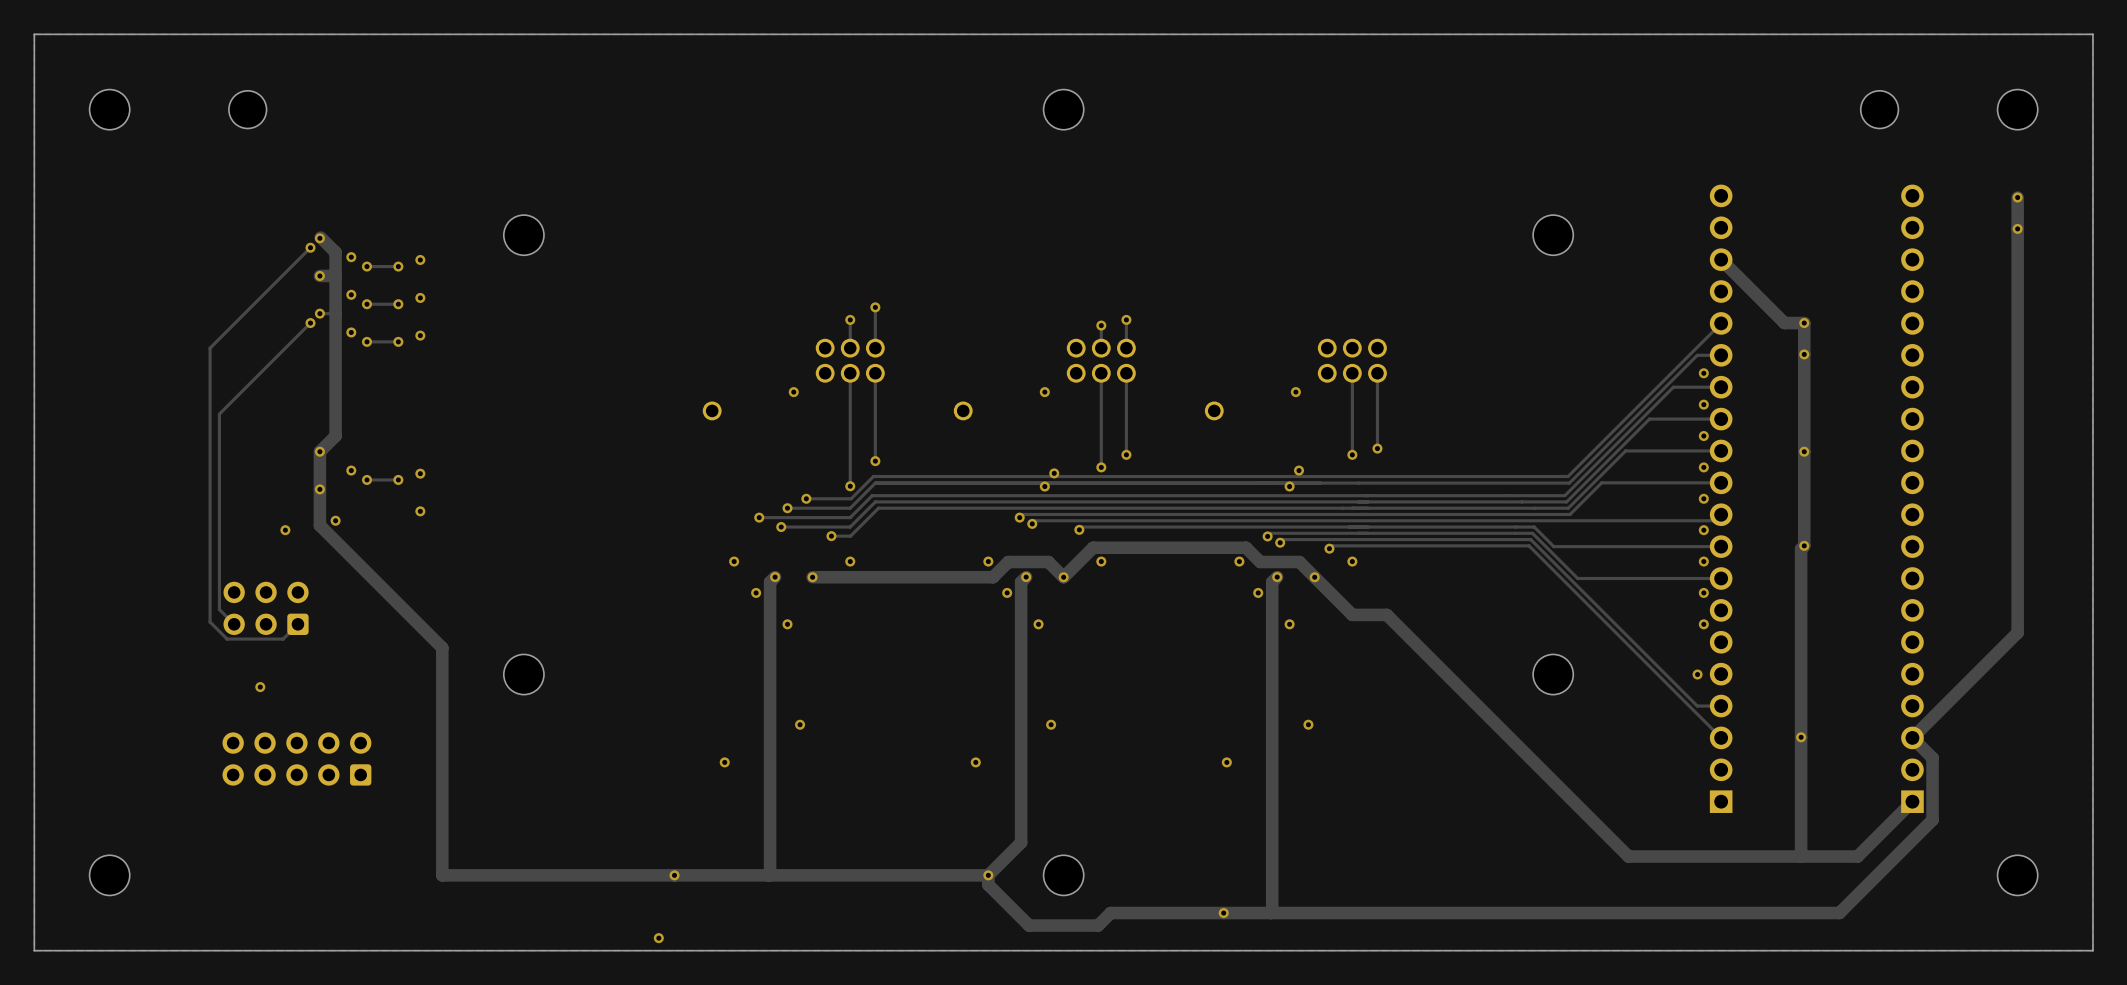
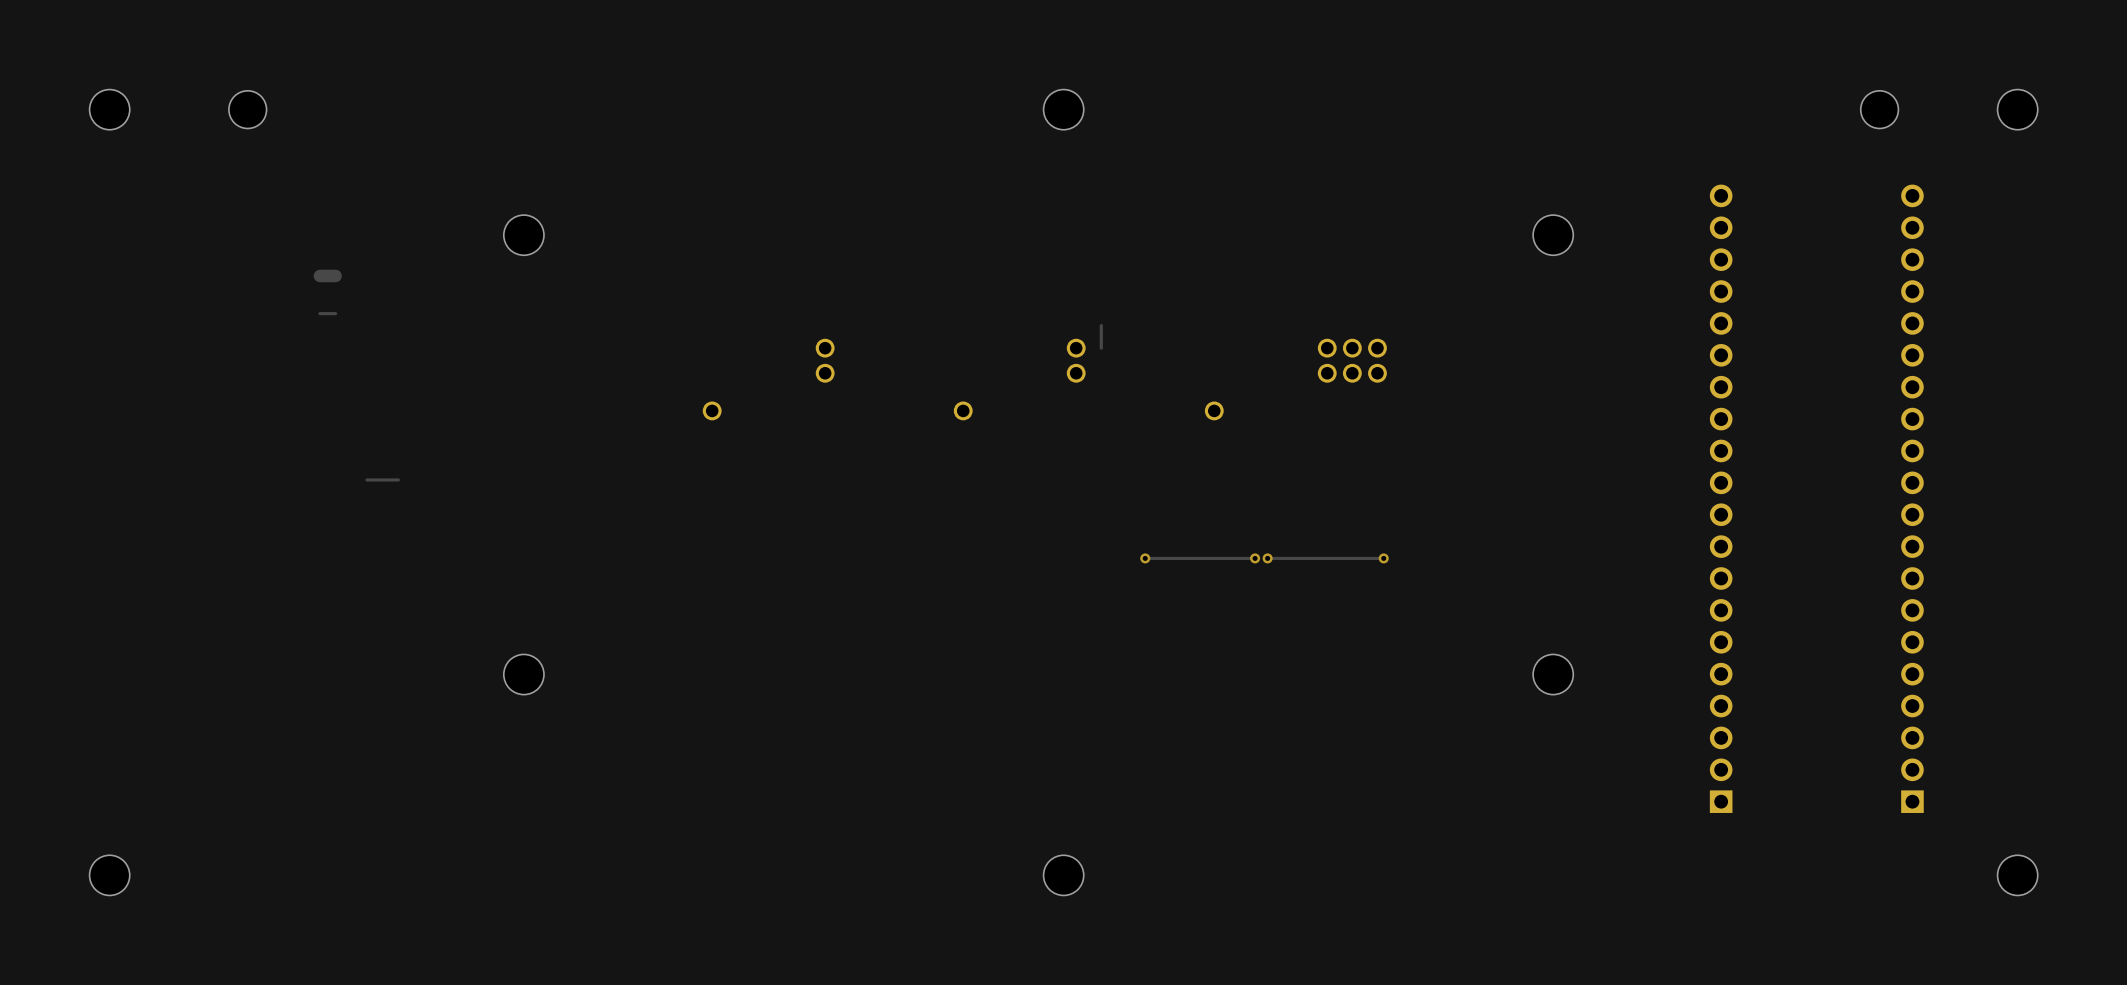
board edge: (2092, 34) (2092, 950) (34, 950) (34, 34) (2092, 34) -> none
track: (2017, 197) (2017, 632) (1912, 737) (1932, 758) (1932, 820) (1839, 913) (1110, 913) (1098, 925) (1029, 925) (988, 884) (988, 875) -> none
via: (2017, 197) -> none
via: (2017, 228) -> none
track: (320, 237) (335, 252) (335, 436) (319, 451) (319, 525) (442, 647) (442, 875) (988, 875) -> none
via: (319, 238) -> none
track: (310, 247) (210, 348) (210, 622) (227, 639) (283, 639) (297, 624) -> none
via: (310, 247) -> none
via: (351, 257) -> none
via: (420, 259) -> none
track: (1721, 259) (1784, 323) (1804, 323) (1804, 545) (1801, 549) (1801, 856) -> none
via: (366, 266) -> none
track: (398, 266) (366, 266) -> none
via: (398, 266) -> none
via: (319, 275) -> none
via: (351, 294) -> none
via: (420, 297) -> none
via: (366, 304) -> none
track: (398, 304) (366, 304) -> none
via: (398, 304) -> none
track: (875, 307) (875, 348) -> none
via: (875, 307) -> none
via: (319, 313) -> none
track: (850, 319) (850, 348) -> none
via: (850, 319) -> none
track: (1126, 319) (1126, 348) -> none
via: (1126, 319) -> none
track: (310, 323) (219, 414) (219, 609) (234, 624) -> none
via: (310, 323) -> none
track: (1721, 323) (1568, 476) (873, 476) (851, 498) (806, 498) -> none
via: (1804, 323) -> none
via: (1101, 325) -> none
via: (351, 332) -> none
via: (420, 335) -> none
via: (366, 341) -> none
track: (398, 341) (366, 341) -> none
via: (398, 341) -> none
part: (850, 348) -> none
part: (875, 348) -> none
part: (1101, 348) -> none
part: (1126, 348) -> none
via: (1804, 354) -> none
track: (1721, 355) (1697, 355) (1569, 483) (875, 483) (850, 508) (787, 508) -> none
track: (850, 373) (850, 486) -> none
part: (850, 373) -> none
track: (875, 373) (875, 461) -> none
part: (875, 373) -> none
track: (1101, 373) (1101, 467) -> none
part: (1101, 373) -> none
track: (1126, 373) (1126, 454) -> none
part: (1126, 373) -> none
track: (1352, 373) (1352, 454) -> none
track: (1377, 373) (1377, 448) -> none
via: (1703, 373) -> none
track: (1721, 387) (1673, 387) (1564, 495) (872, 495) (850, 517) (759, 517) -> none
via: (793, 392) -> none
via: (1044, 392) -> none
via: (1295, 392) -> none
via: (1703, 404) -> none
track: (1721, 419) (1649, 419) (1566, 501) (875, 501) (850, 527) (781, 527) -> none
via: (1703, 436) -> none
via: (1377, 448) -> none
track: (1721, 450) (1625, 450) (1568, 508) (878, 508) (850, 536) (831, 536) -> none
via: (319, 451) -> none
via: (1804, 451) -> none
via: (1126, 454) -> none
via: (1352, 454) -> none
via: (875, 461) -> none
via: (1101, 467) -> none
via: (1703, 467) -> none
via: (351, 470) -> none
via: (1299, 470) -> none
via: (420, 473) -> none
via: (1054, 473) -> none
via: (366, 479) -> none
via: (398, 479) -> none
track: (1721, 482) (1601, 482) (1570, 514) (1022, 514) (1019, 517) -> none
via: (850, 486) -> none
via: (1044, 486) -> none
via: (1289, 486) -> none
via: (319, 489) -> none
via: (806, 498) -> none
via: (1703, 498) -> none
via: (787, 508) -> none
via: (420, 511) -> none
track: (1721, 514) (1715, 520) (1035, 520) (1032, 523) -> none
via: (759, 517) -> none
via: (1019, 517) -> none
via: (335, 520) -> none
via: (1032, 523) -> none
via: (781, 527) -> none
track: (1079, 529) (1082, 527) (1534, 527) (1553, 546) (1721, 546) -> none
via: (1079, 529) -> none
via: (285, 530) -> none
via: (1703, 530) -> none
via: (831, 536) -> none
track: (1267, 536) (1270, 533) (1532, 533) (1577, 578) (1721, 578) -> none
via: (1267, 536) -> none
track: (1280, 542) (1283, 539) (1530, 539) (1697, 706) (1721, 706) -> none
via: (1280, 542) -> none
via: (1804, 545) -> none
track: (1329, 548) (1332, 545) (1529, 545) (1721, 737) -> none
via: (1329, 548) -> none
via: none -> (1145, 558)
track: none -> (1255, 558) (1145, 558)
via: none -> (1255, 558)
via: none -> (1267, 558)
track: none -> (1383, 558) (1267, 558)
via: none -> (1383, 558)
via: (734, 561) -> none
via: (850, 561) -> none
via: (988, 561) -> none
via: (1101, 561) -> none
via: (1239, 561) -> none
via: (1352, 561) -> none
via: (1703, 561) -> none
track: (775, 577) (770, 582) (768, 875) -> none
via: (775, 577) -> none
track: (812, 577) (993, 577) (1008, 562) (1048, 562) (1063, 577) (1093, 547) (1246, 547) (1260, 562) (1299, 562) (1352, 614) (1386, 614) (1628, 856) (1857, 856) (1912, 801) -> none
via: (812, 577) -> none
track: (1026, 577) (1021, 582) (1021, 842) (988, 875) -> none
via: (1026, 577) -> none
via: (1063, 577) -> none
track: (1277, 577) (1272, 582) (1270, 913) -> none
via: (1277, 577) -> none
via: (1314, 577) -> none
via: (756, 592) -> none
via: (1007, 592) -> none
via: (1258, 592) -> none
via: (1703, 592) -> none
part: (266, 608) -> none
via: (787, 624) -> none
via: (1038, 624) -> none
via: (1289, 624) -> none
via: (1703, 624) -> none
via: (1697, 674) -> none
via: (260, 687) -> none
via: (800, 724) -> none
via: (1051, 724) -> none
via: (1308, 724) -> none
via: (1801, 737) -> none
part: (296, 759) -> none
via: (724, 762) -> none
via: (975, 762) -> none
via: (1226, 762) -> none
via: (674, 875) -> none
via: (988, 875) -> none
via: (1223, 913) -> none
via: (658, 938) -> none

